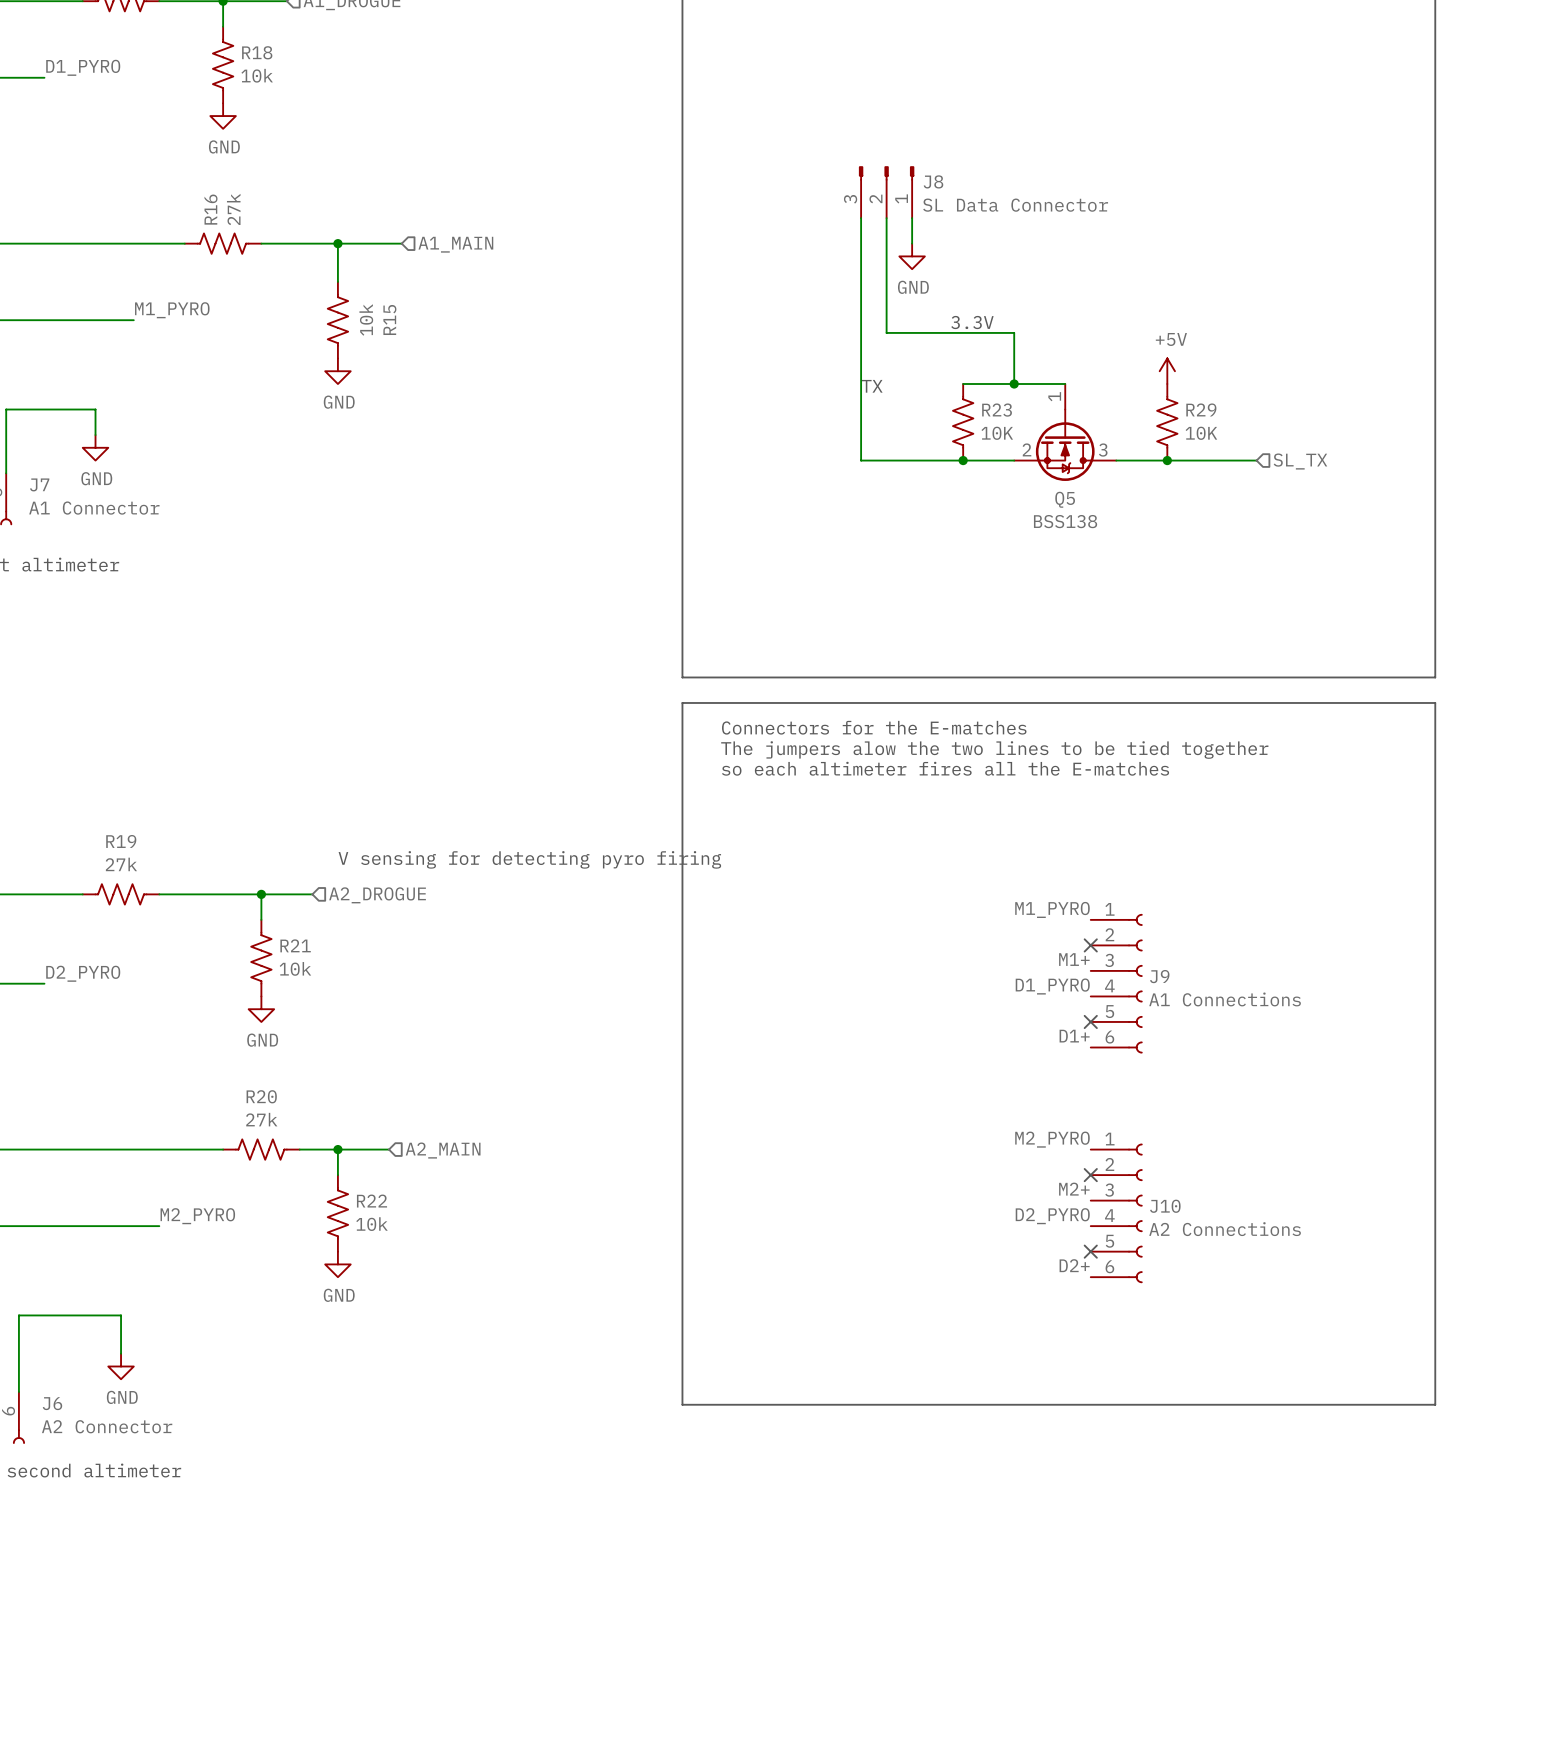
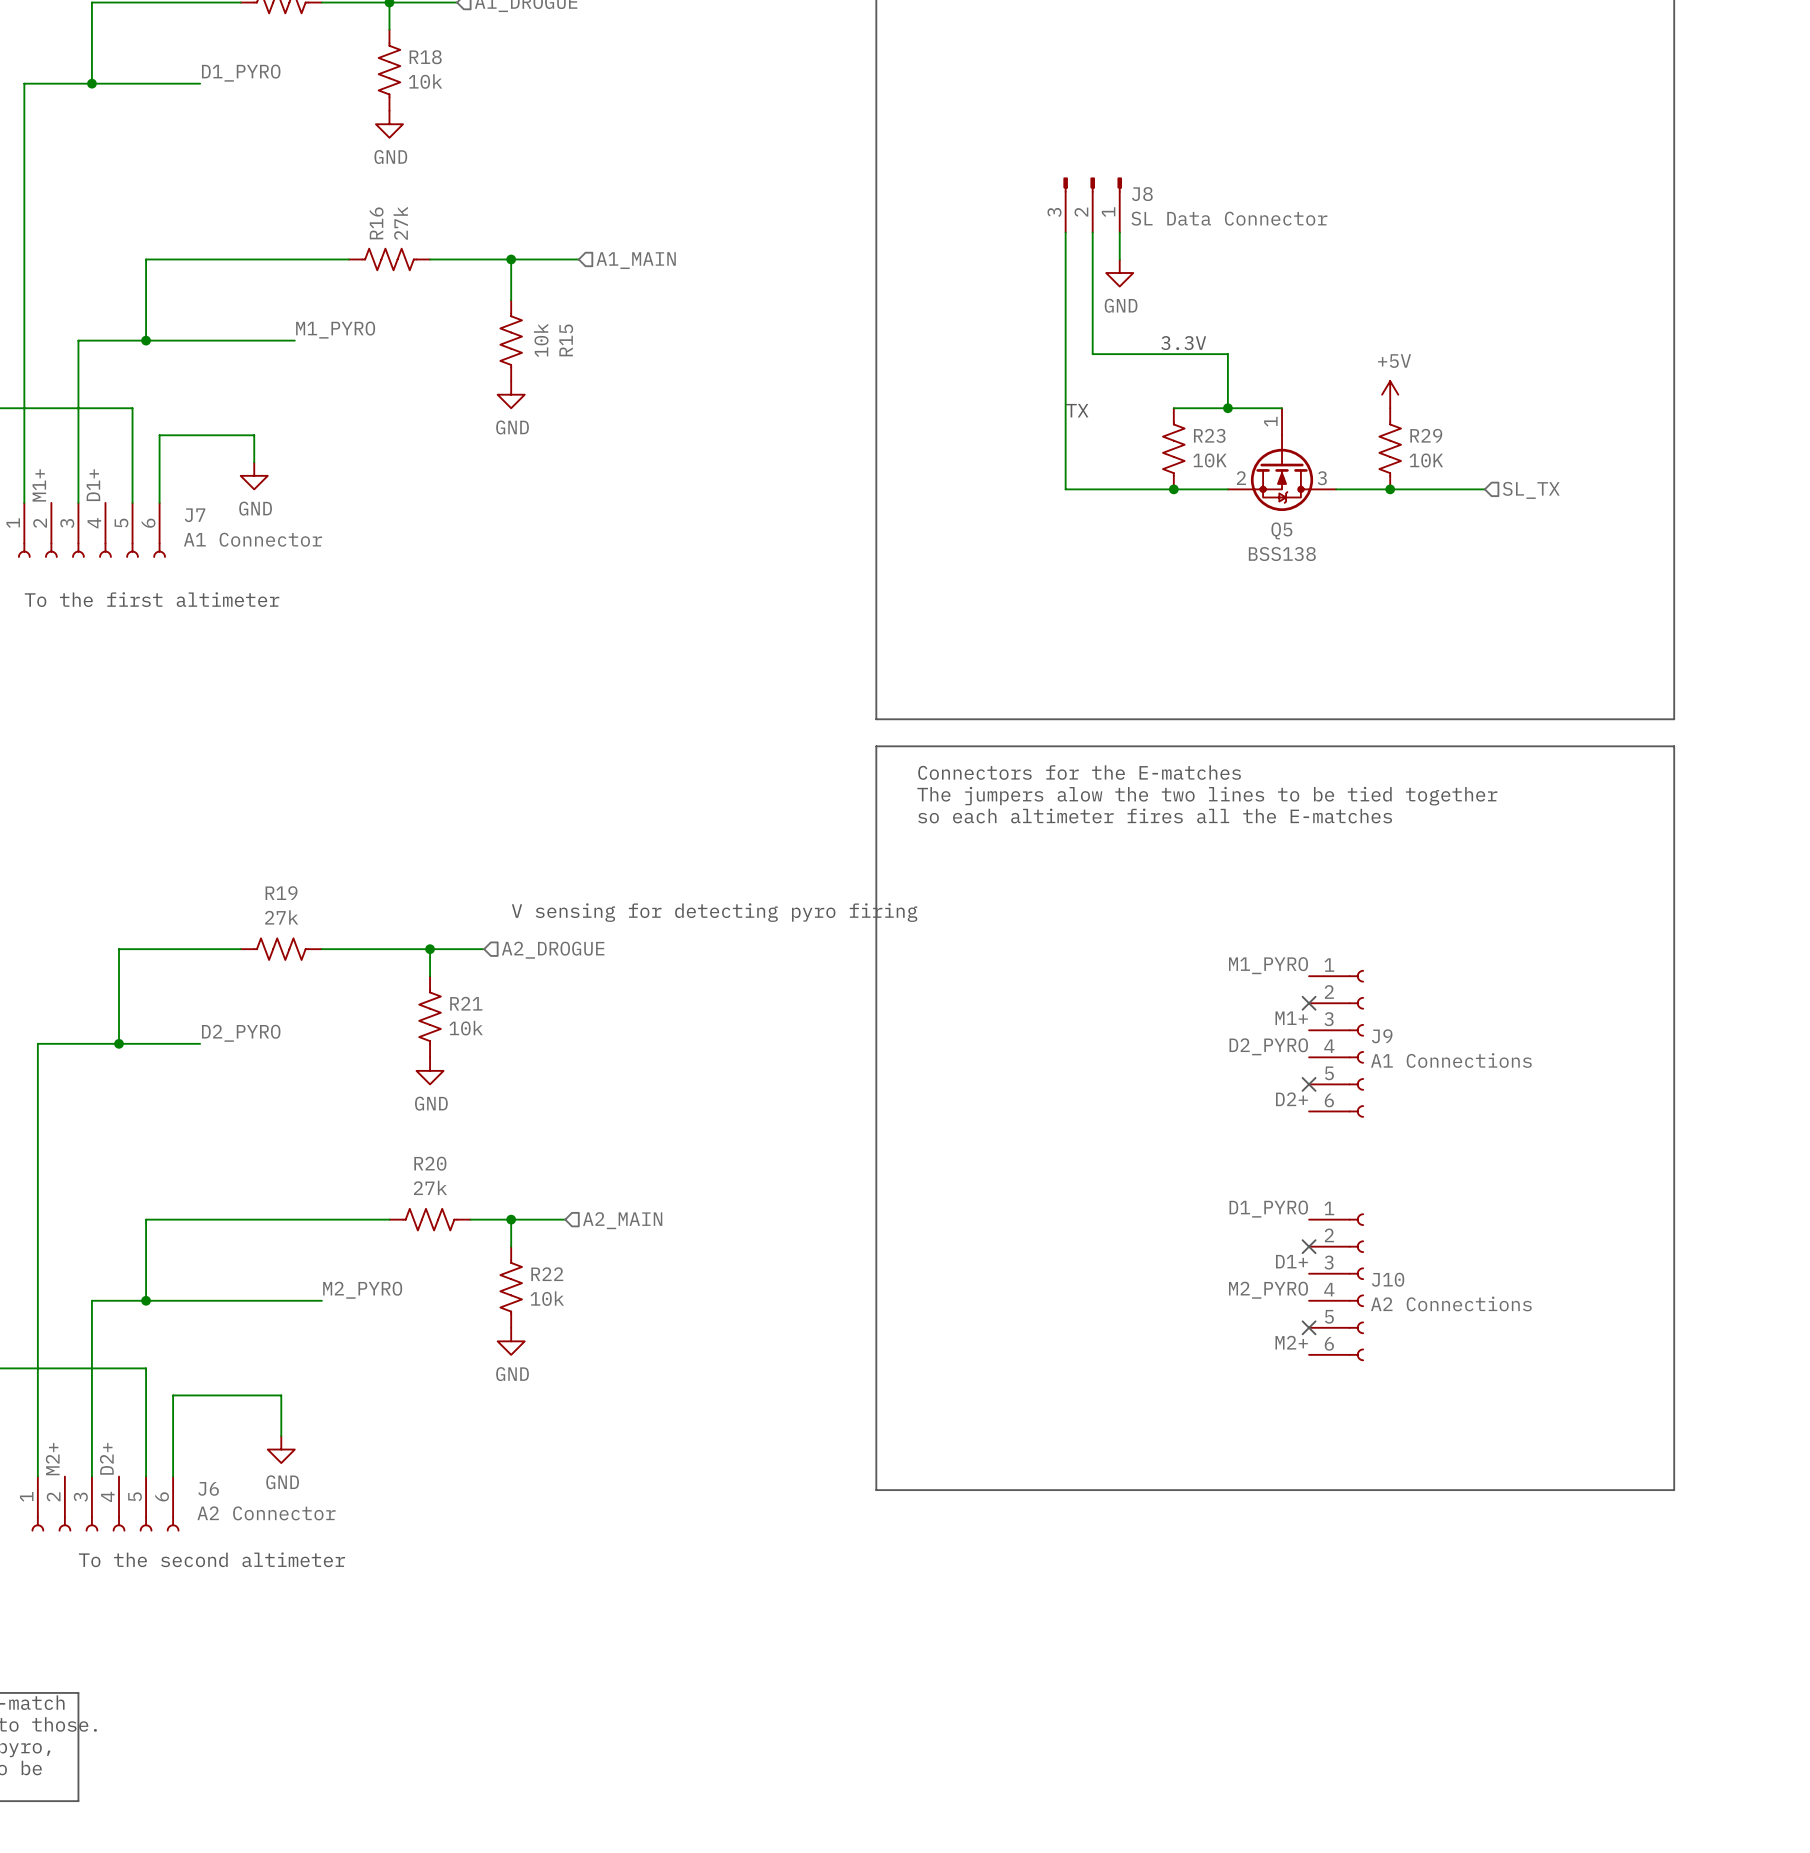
label: D1_PYRO (1052, 986) -> D2_PYRO (1268, 1046)
label: D1+ (1074, 1036) -> D2+ (1291, 1099)
label: M2_PYRO (1052, 1139) -> D1_PYRO (1268, 1209)
label: M2+ (1074, 1189) -> D1+ (1291, 1261)
label: D2_PYRO (1052, 1216) -> M2_PYRO (1268, 1290)
label: D2+ (1074, 1265) -> M2+ (1291, 1342)

